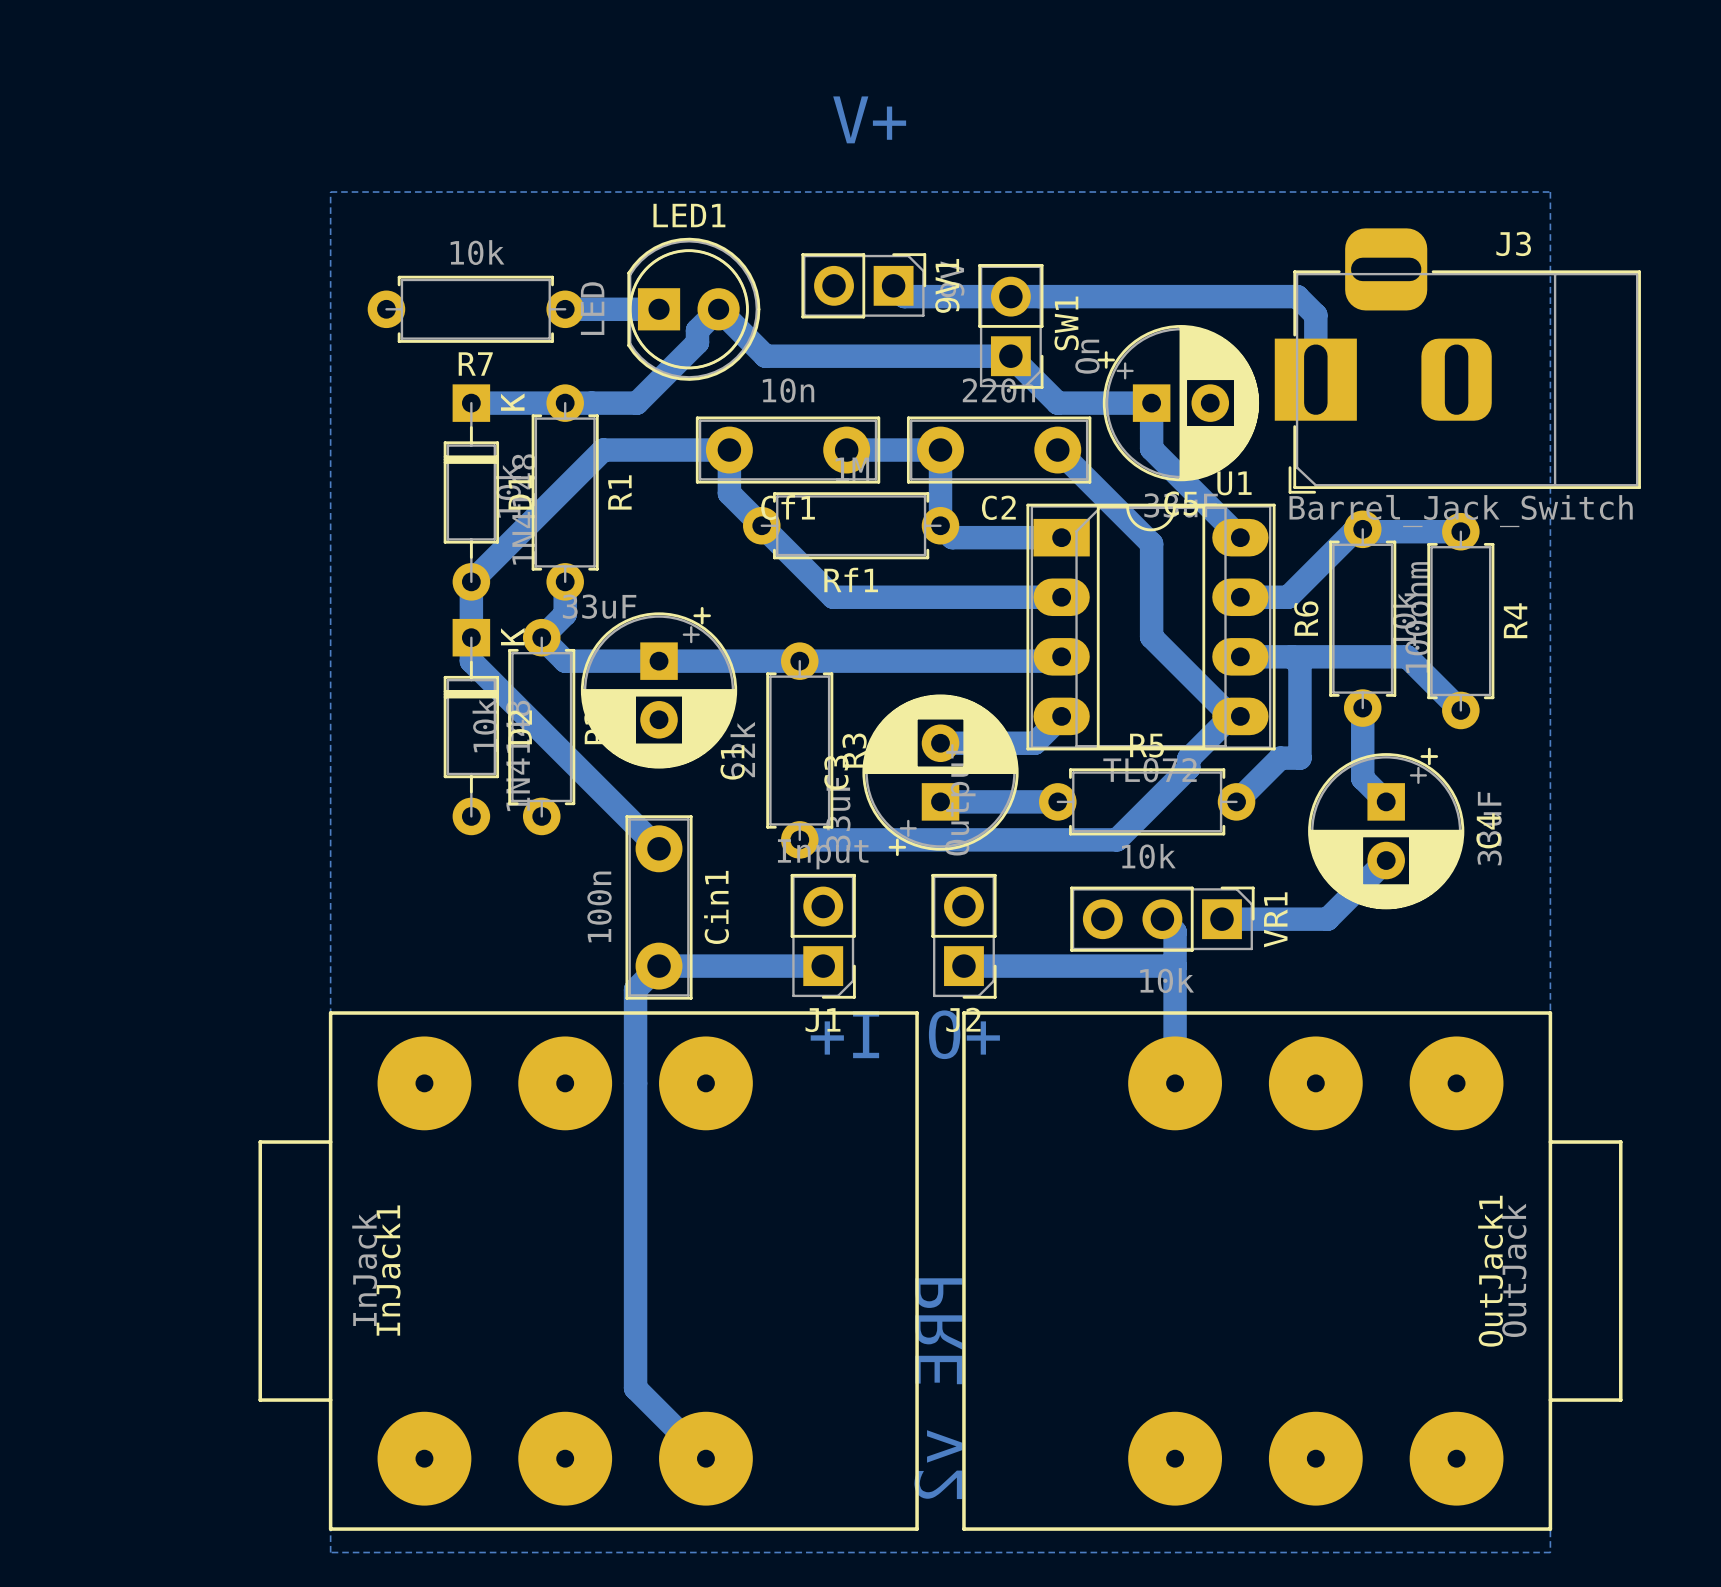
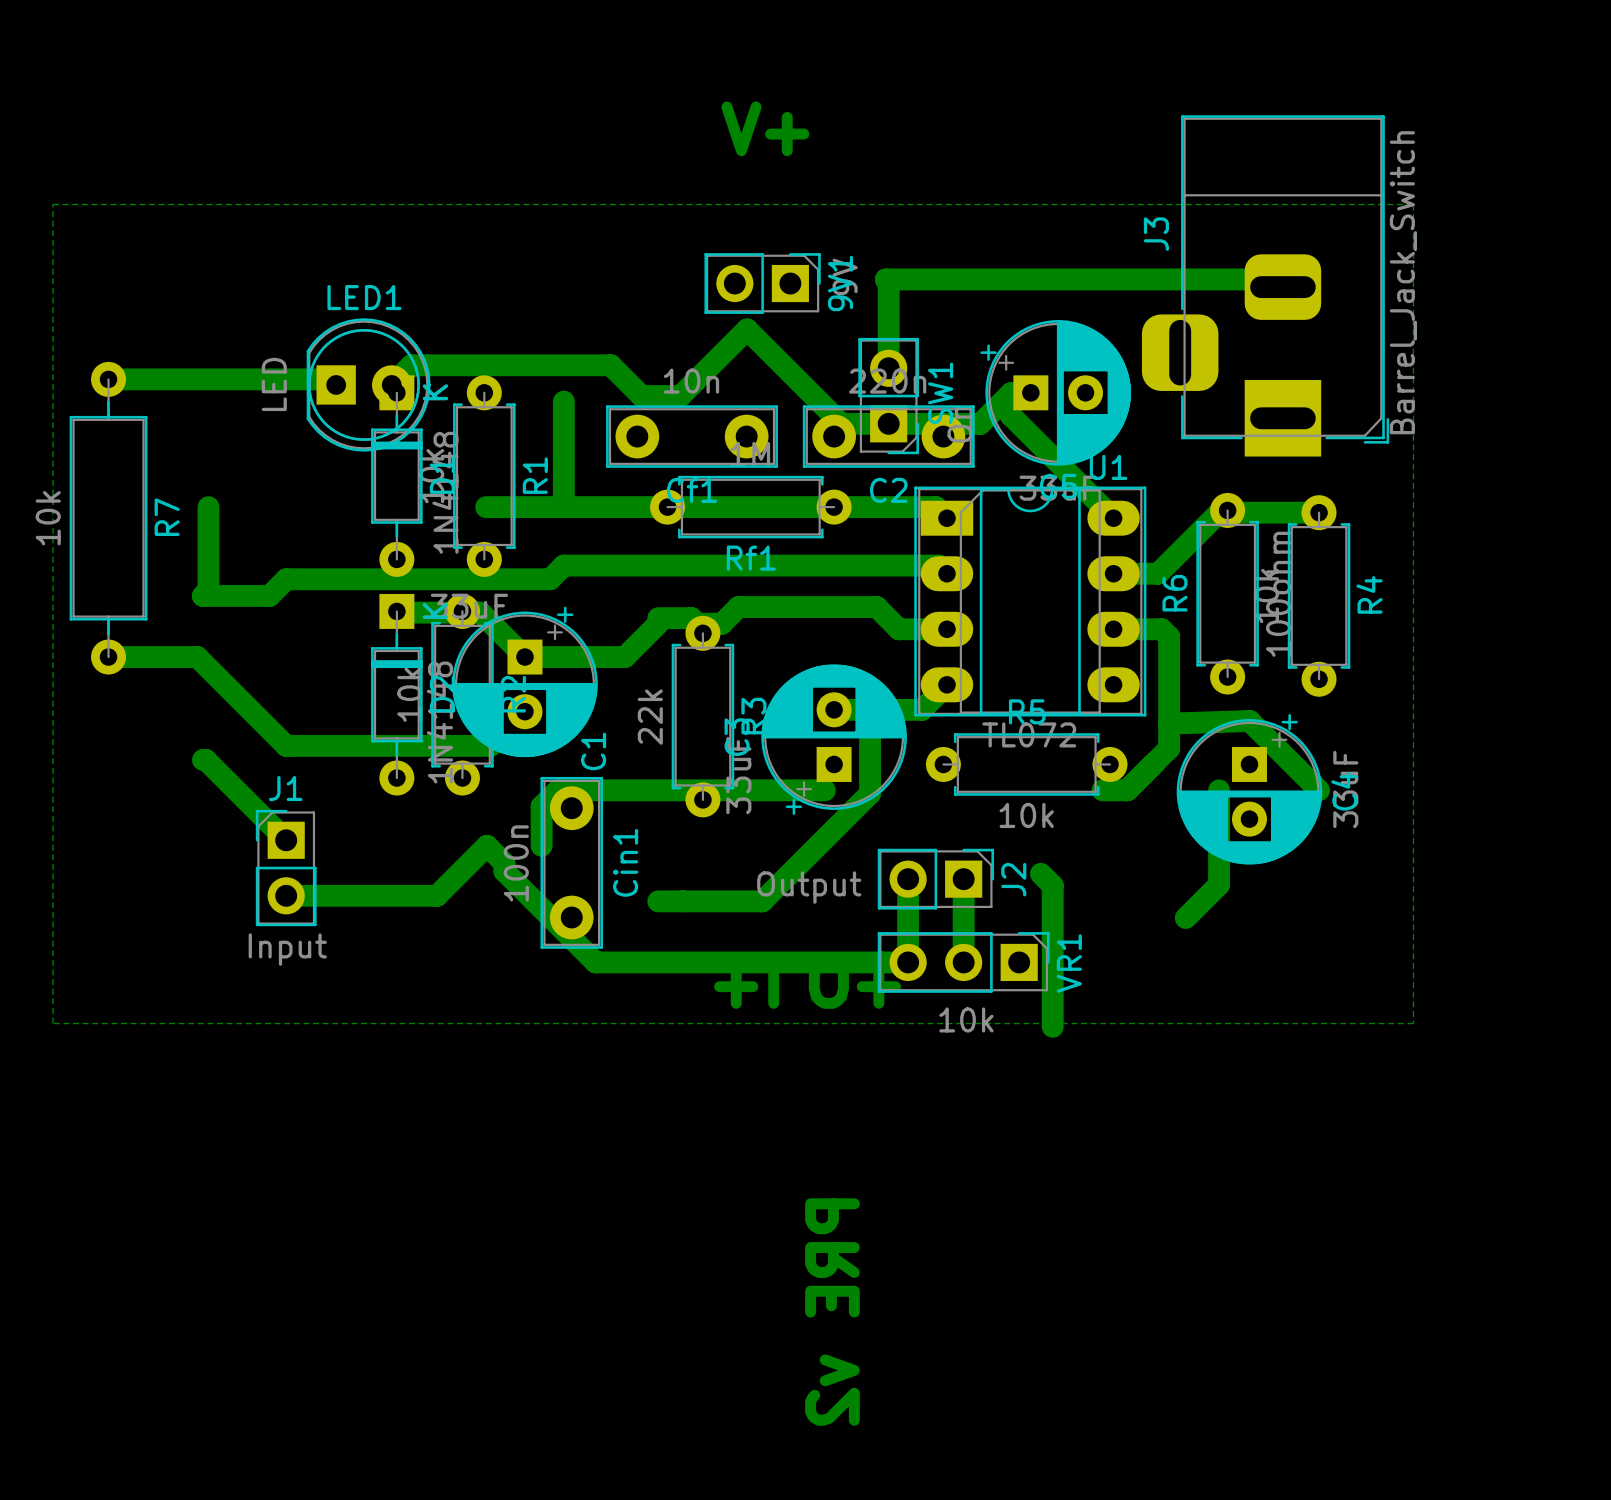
bottom zone outline: (330, 192) (330, 1552) (1550, 1552) (1550, 192) (330, 192) -> (52, 204) (52, 1023) (1413, 1023) (1413, 204) (52, 204)
R7 value position: 10k (477, 252) -> 10k (48, 518)
R7 footprint: [367, 275, 584, 343] -> [69, 361, 148, 675]
bottom track: (893, 285) (904, 296) (1297, 296) (1315, 315) (1315, 379) -> none
bottom track: none -> (1282, 287) (1275, 279) (885, 279) (888, 282) (888, 368)
bottom track: (565, 309) (659, 309) -> none
LED1 position: (693, 309) -> (368, 384)
SW1 position: (1010, 326) -> (888, 396)
J3 rotation: 0° (1457, 361) -> 90° counterclockwise (1265, 285)
R7 name position: R7 (475, 364) -> R7 (167, 517)
bottom track: none -> (108, 379) (330, 379) (336, 384)
bottom track: (471, 403) (636, 403) (697, 342) (697, 330) (718, 309) (765, 356) (1010, 356) (1057, 403) (1151, 403) (1151, 448) -> (391, 384) (411, 365) (610, 365) (641, 396) (680, 396) (747, 329) (841, 423) (980, 423) (1010, 393) (1010, 415) (1030, 435)
bottom track: none -> (563, 401) (563, 507)
bottom track: (846, 450) (940, 450) (940, 525) (952, 537) (1061, 537) (1055, 543) -> none
bottom track: (1057, 450) (1151, 543) (1151, 637) (1231, 716) (1188, 758) (1188, 768) (1116, 839) (799, 839) -> none
bottom track: none -> (486, 507) (935, 507) (947, 518)
bottom track: (565, 581) (565, 614) (541, 637) (565, 661) (1057, 661) (1061, 656) -> (658, 618) (691, 618) (697, 623) (721, 623) (738, 607) (876, 607) (898, 629) (947, 629)
bottom track: (1061, 597) (833, 597) (729, 493) (729, 450) (603, 450) (471, 581) (471, 661) (659, 848) -> (947, 573) (938, 565) (563, 565) (550, 579) (286, 579) (269, 595) (202, 595) (208, 590) (208, 507)
bottom track: none -> (391, 612) (480, 612) (524, 657) (624, 657) (658, 623)
bottom track: (1291, 656) (1407, 656) (1460, 710) -> none
bottom track: none -> (108, 657) (197, 657) (286, 745) (490, 745)
C1 position: (659, 687) -> (524, 681)
bottom track: (1362, 708) (1362, 778) (1386, 801) -> none
bottom track: none -> (870, 696) (870, 793) (762, 901) (658, 901)
bottom track: (1299, 758) (1280, 758) (1236, 801) -> none
bottom track: none -> (202, 759) (205, 759) (286, 840)
bottom track: (940, 801) (1057, 801) -> none
bottom track: none -> (824, 790) (557, 790) (541, 806) (541, 845)
bottom track: none -> (1102, 790) (1127, 790) (1169, 748) (1169, 723) (1249, 721) (1319, 790)
bottom track: none -> (1219, 790) (1219, 884) (1185, 918)
bottom track: (1386, 860) (1327, 919) (1222, 919) -> none
VR1 position: (1162, 919) -> (963, 962)
bottom track: none -> (908, 879) (908, 962) (595, 962) (504, 871) (504, 863) (486, 845) (437, 895) (286, 895)
bottom track: none -> (963, 879) (963, 962)
J1 rotation: 0° (823, 936) -> 180° (286, 868)
J1 position: (823, 936) -> (286, 868)
J2 rotation: 0° (963, 936) -> 90° counterclockwise (935, 879)
J2 position: (963, 936) -> (935, 879)
bottom track: (823, 966) (659, 966) (635, 989) (635, 1388) (705, 1458) -> none
bottom track: (963, 966) (1175, 966) -> none
InJack1: InJack (588, 1271) -> none
OutJack1: OutJack (1292, 1271) -> none

